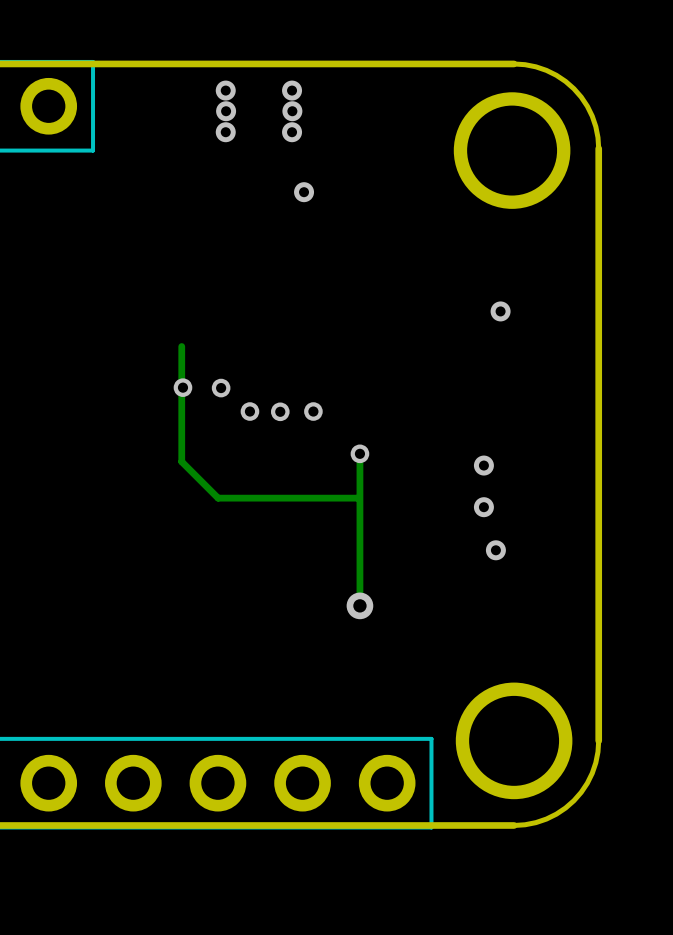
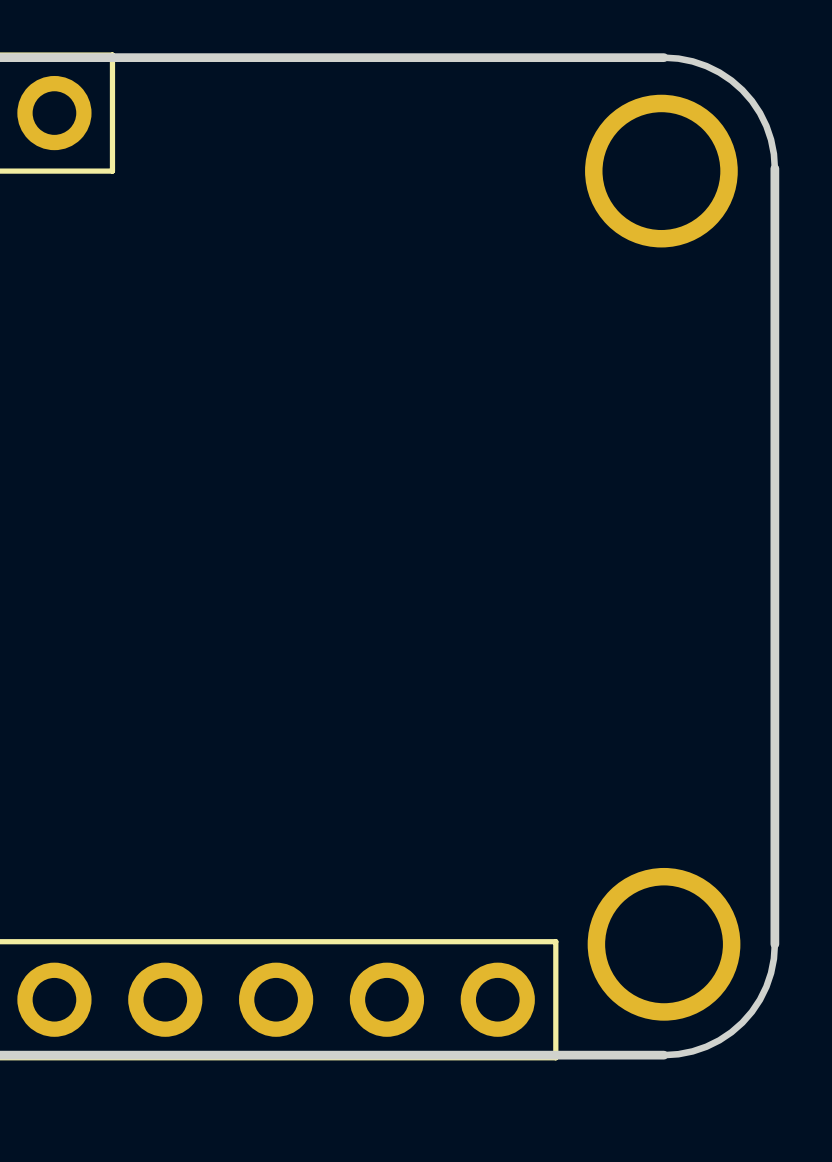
via: (225, 90) -> none
via: (292, 90) -> none
via: (226, 111) -> none
via: (292, 111) -> none
via: (225, 132) -> none
via: (292, 132) -> none
via: (304, 192) -> none
via: (500, 311) -> none
track: (181, 346) (181, 461) (218, 498) (357, 498) -> none
via: (182, 387) -> none
via: (221, 388) -> none
via: (249, 411) -> none
via: (280, 411) -> none
via: (313, 411) -> none
track: (359, 453) (359, 605) -> none
via: (359, 453) -> none
via: (483, 465) -> none
via: (483, 507) -> none
via: (495, 550) -> none
via: (359, 605) -> none

